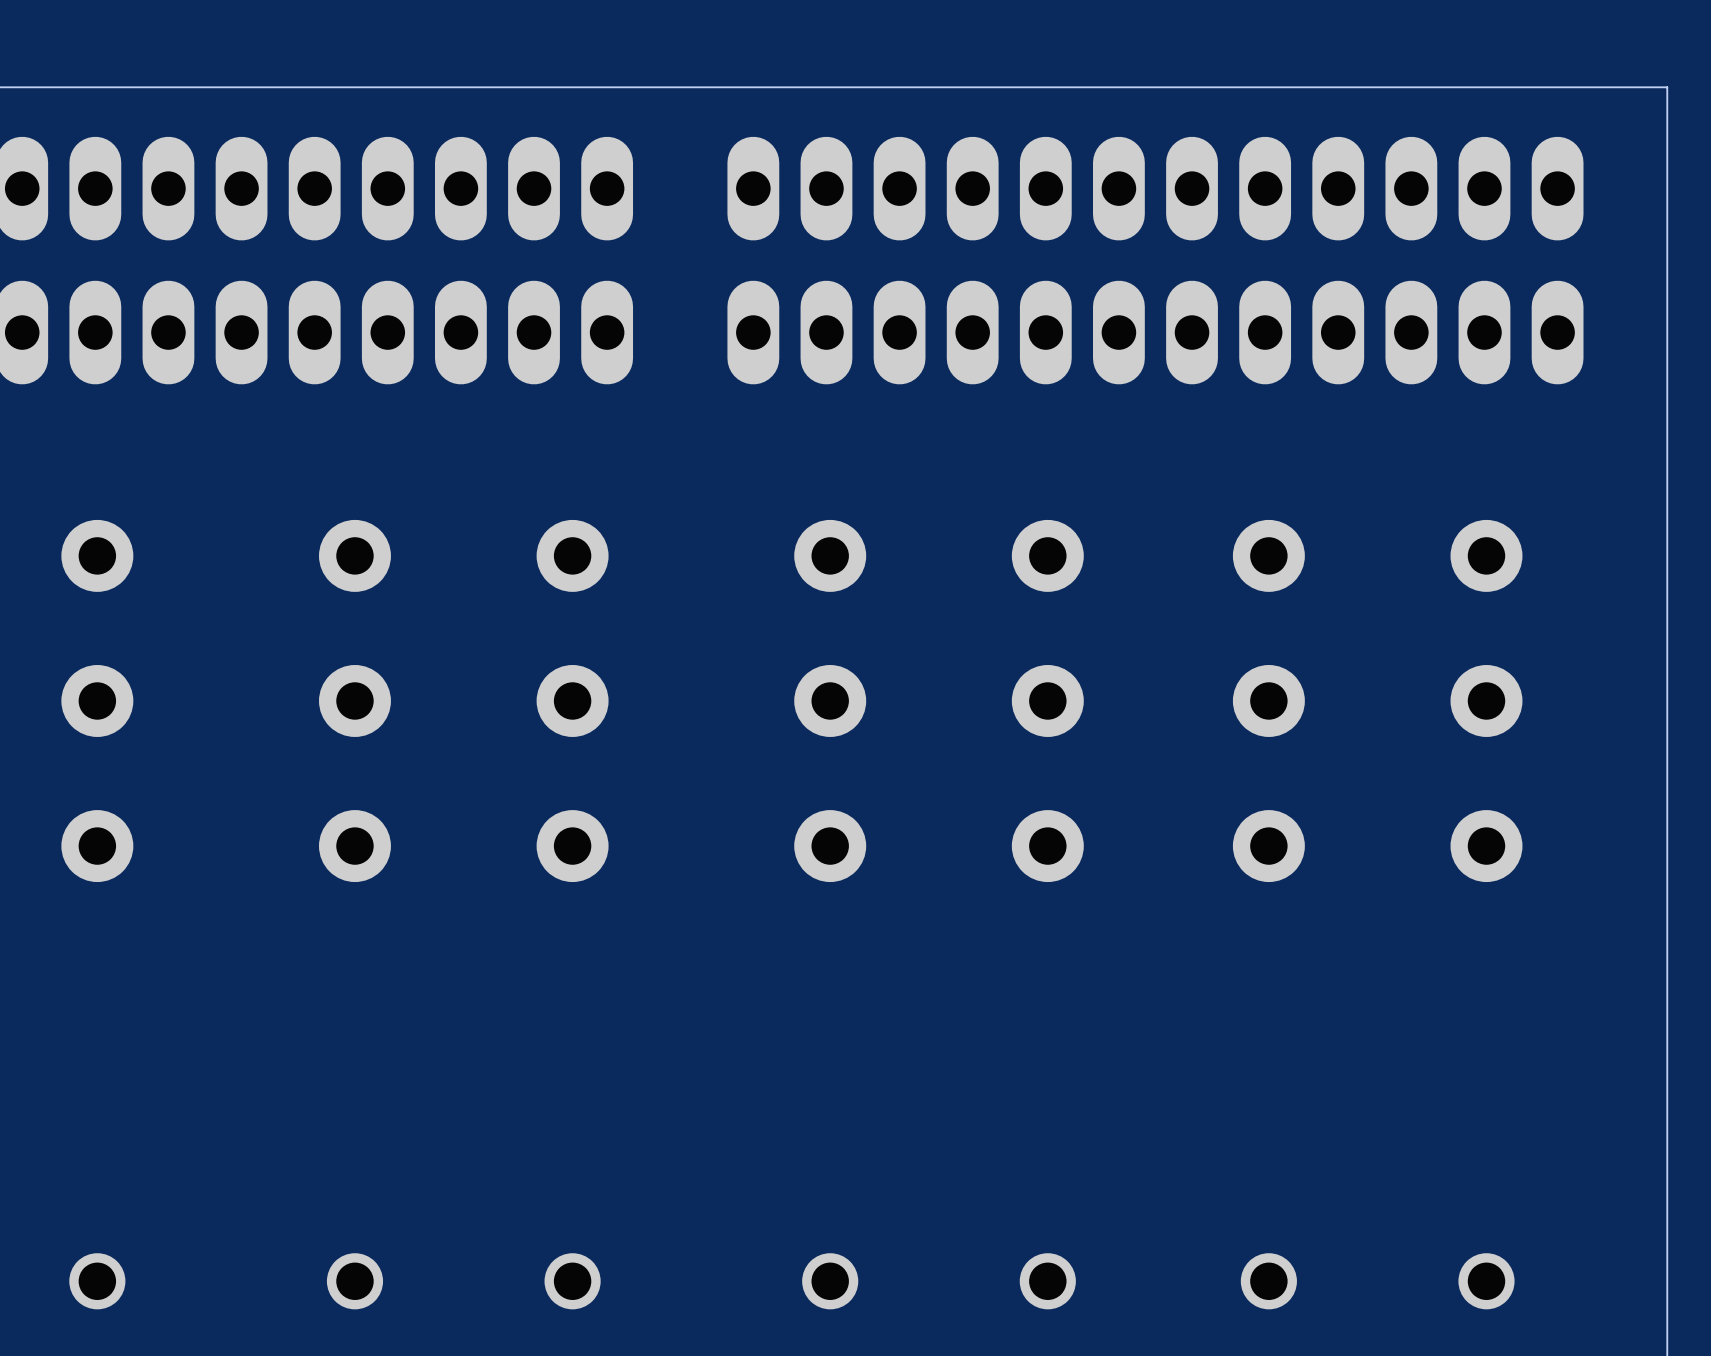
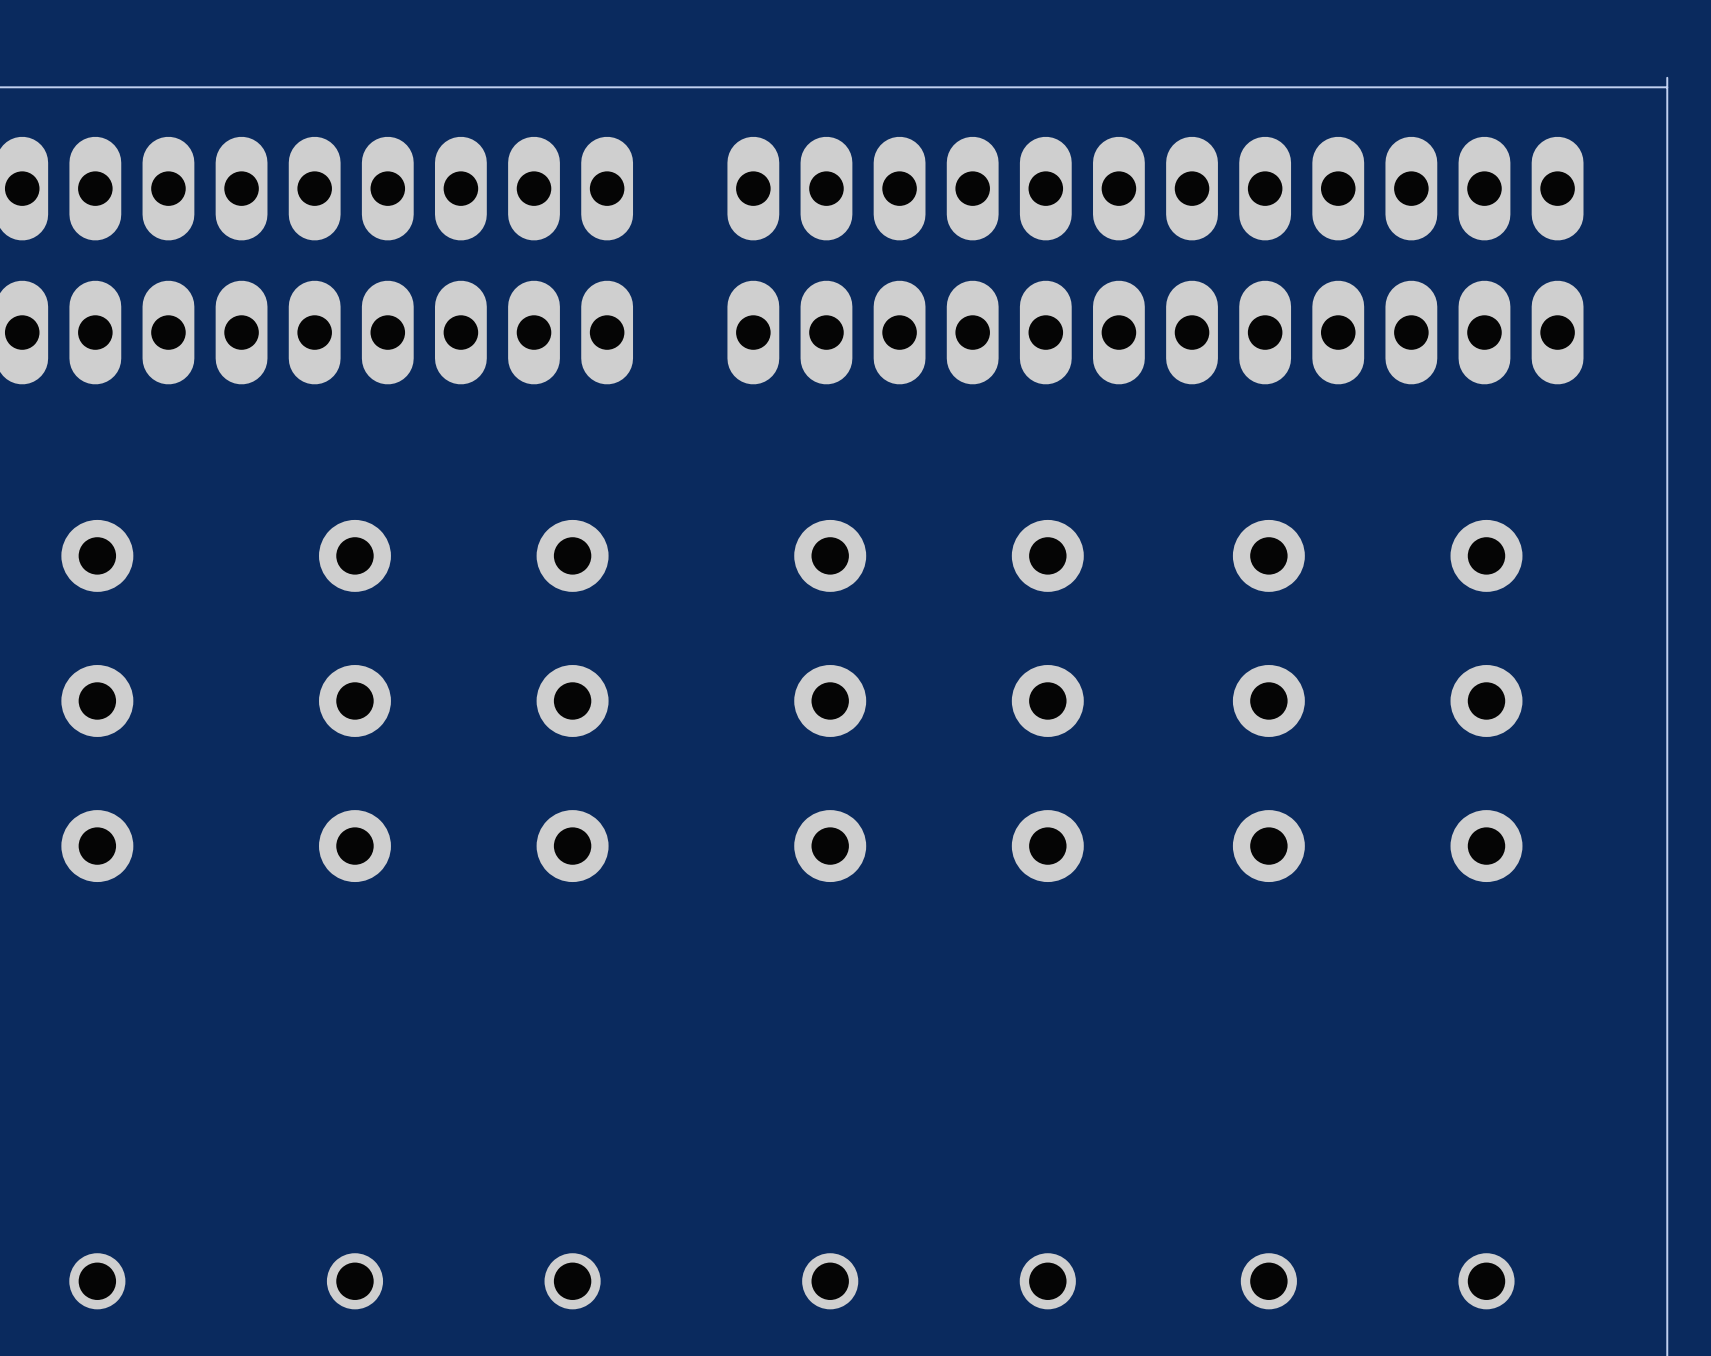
board edge: none -> (1667, 77) (1667, 87)

